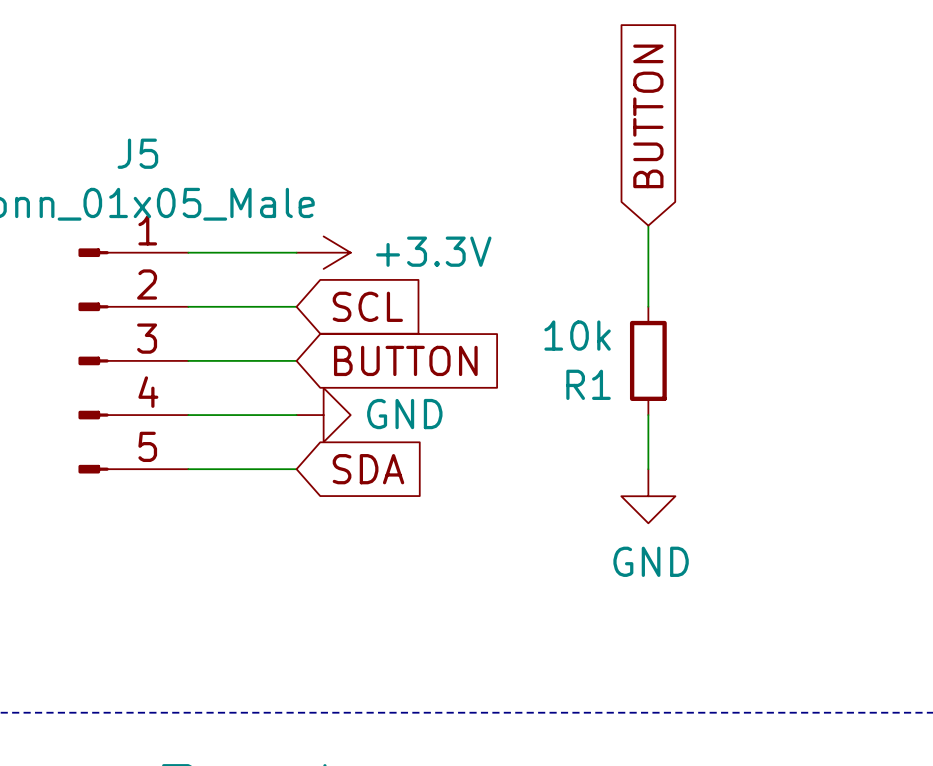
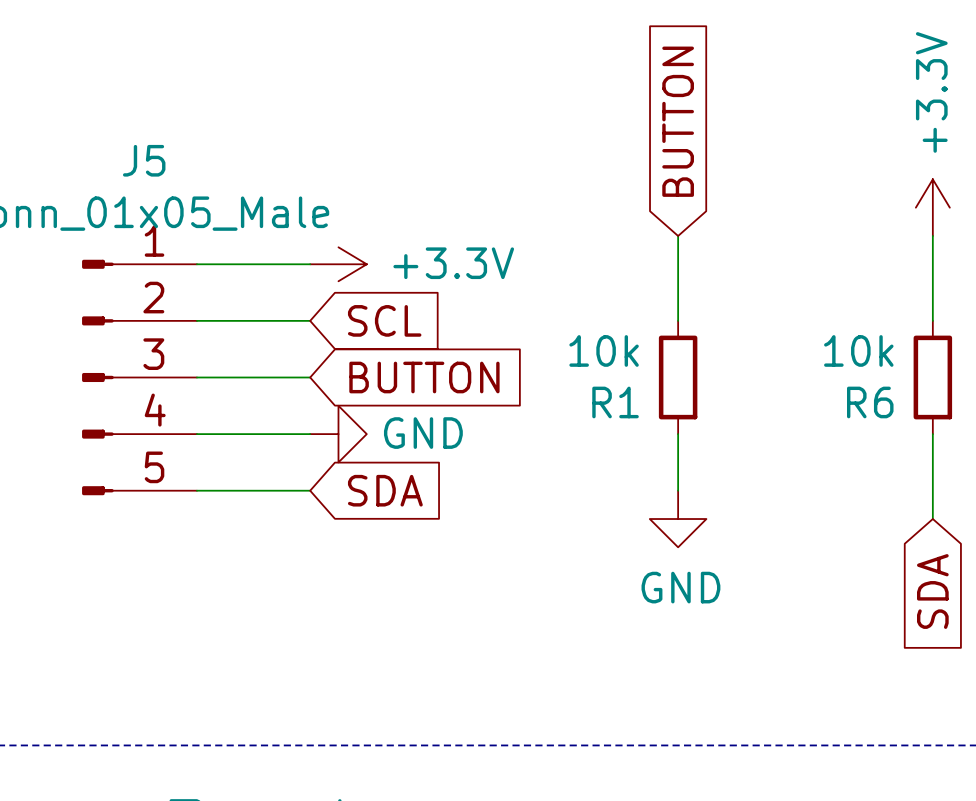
power symbol: none -> +3.3V (932, 207)
wire: none -> (932, 235) (932, 320)
R6: none -> 10k (932, 377)
wire: none -> (932, 434) (932, 519)
global label: none -> SDA (932, 591)

